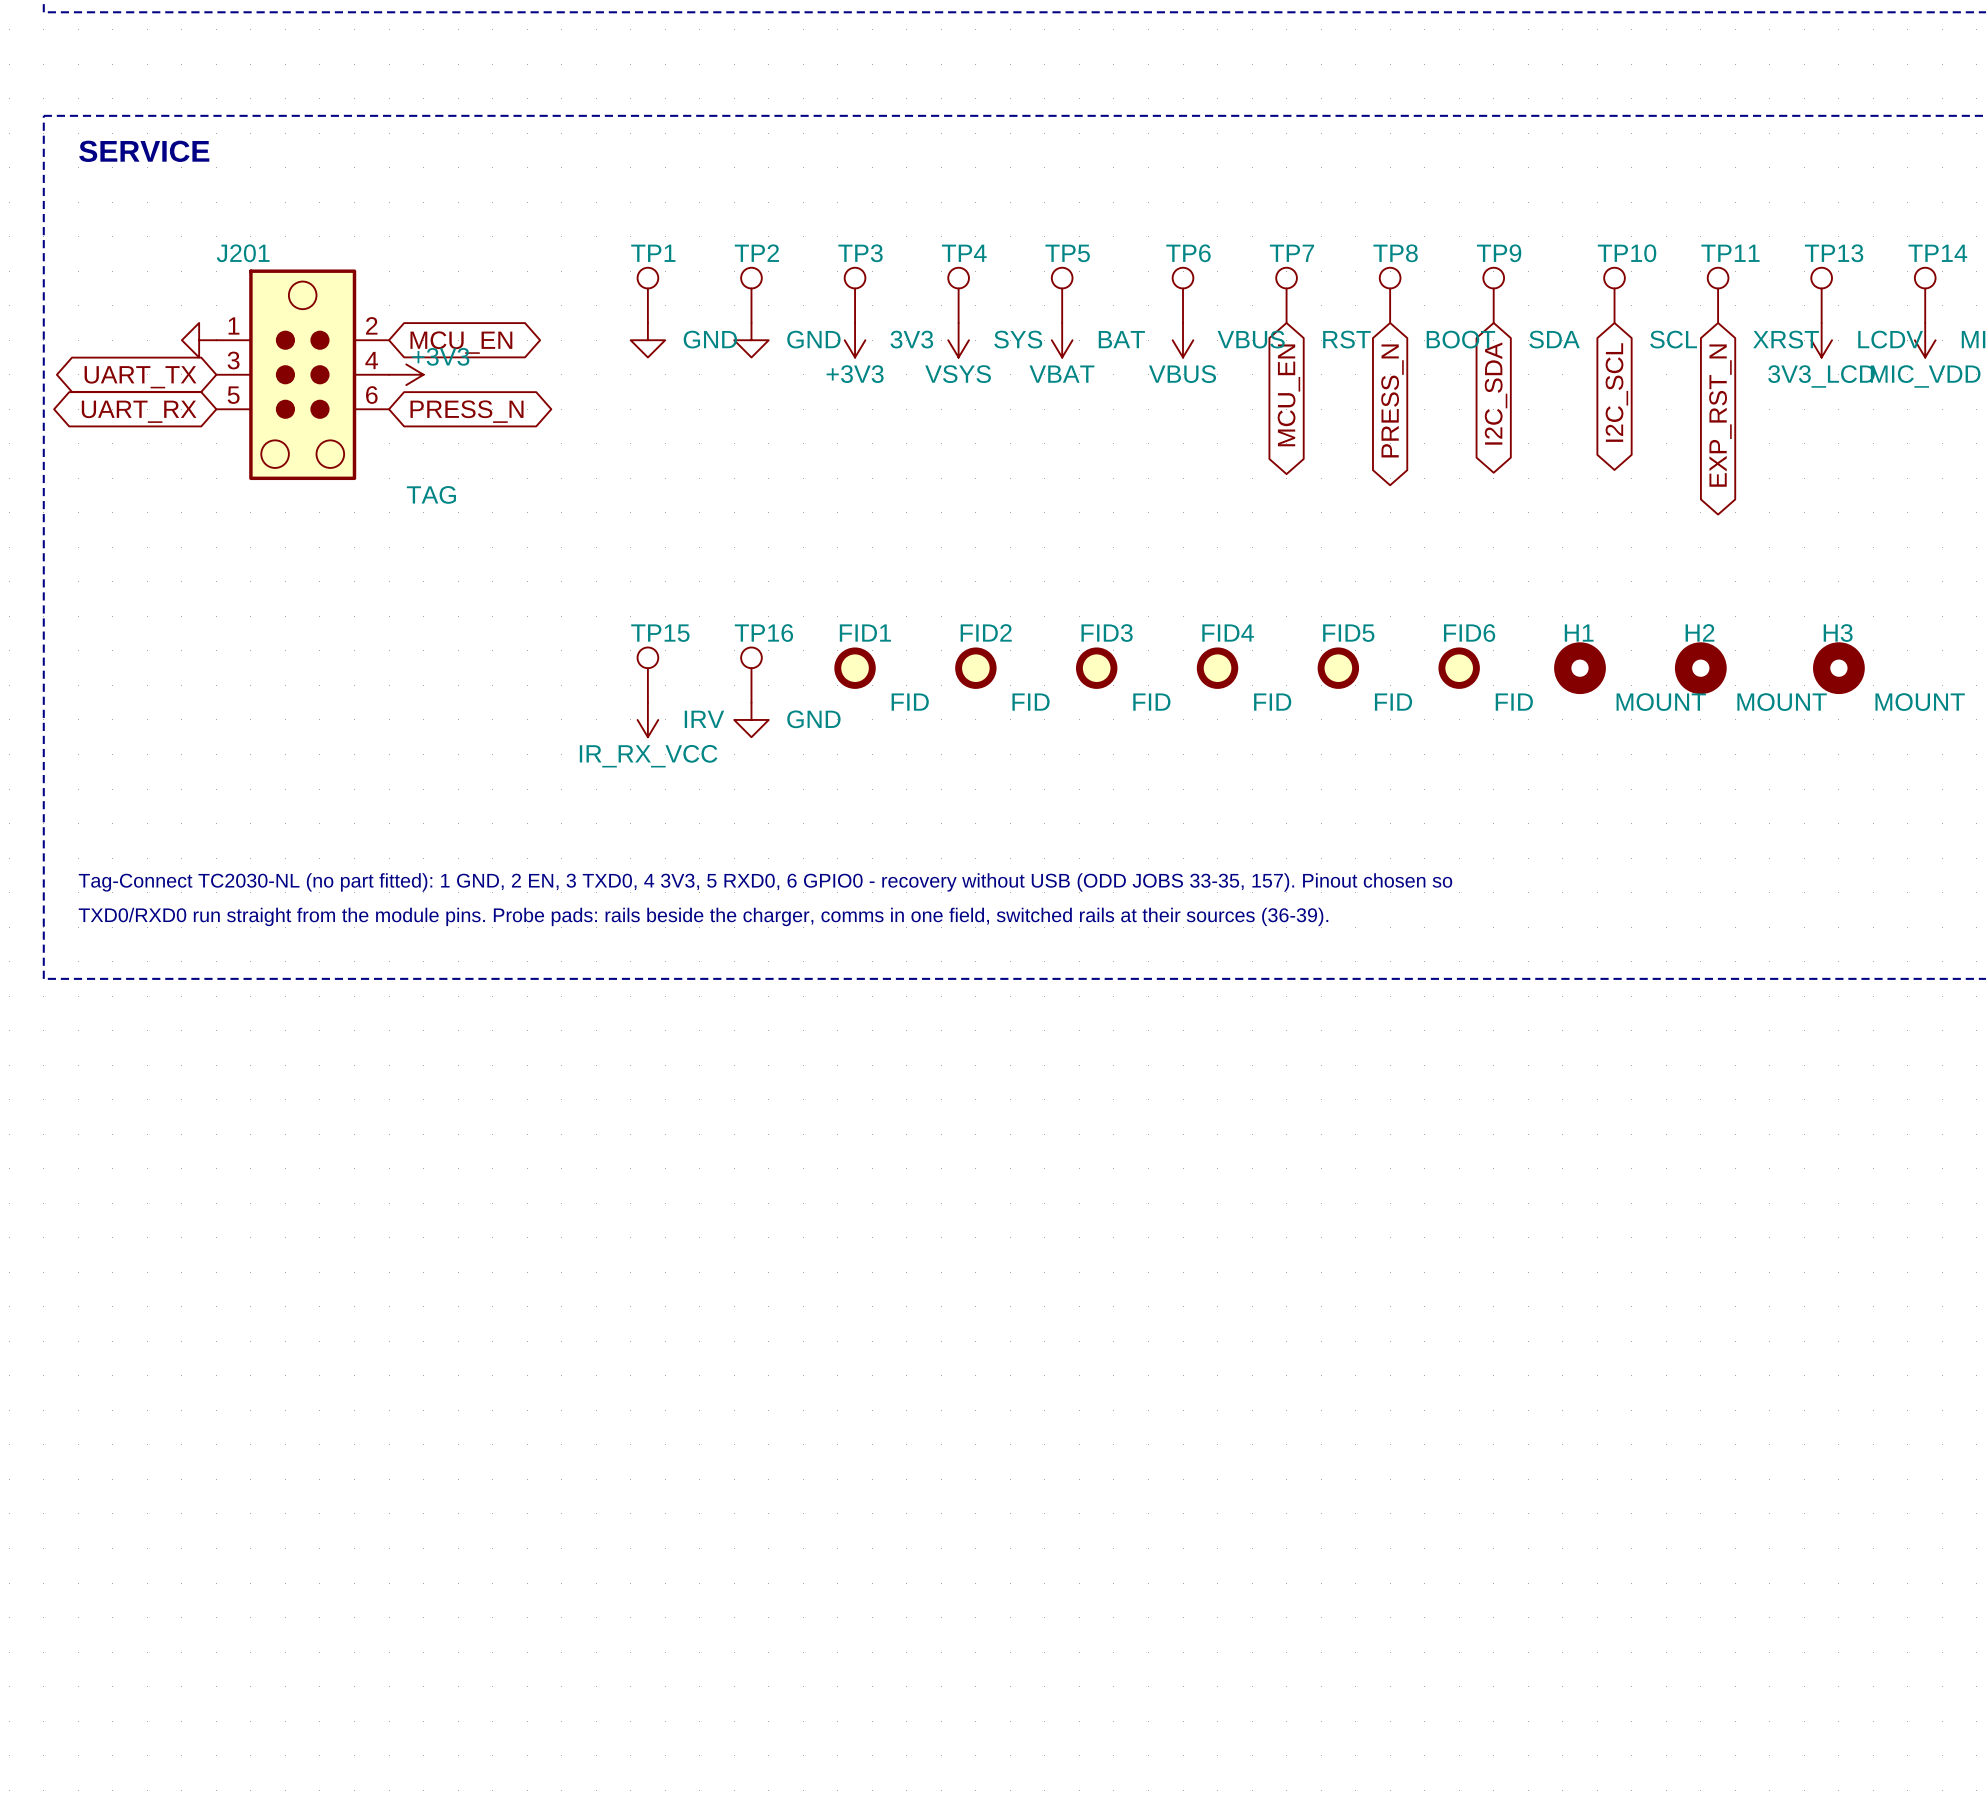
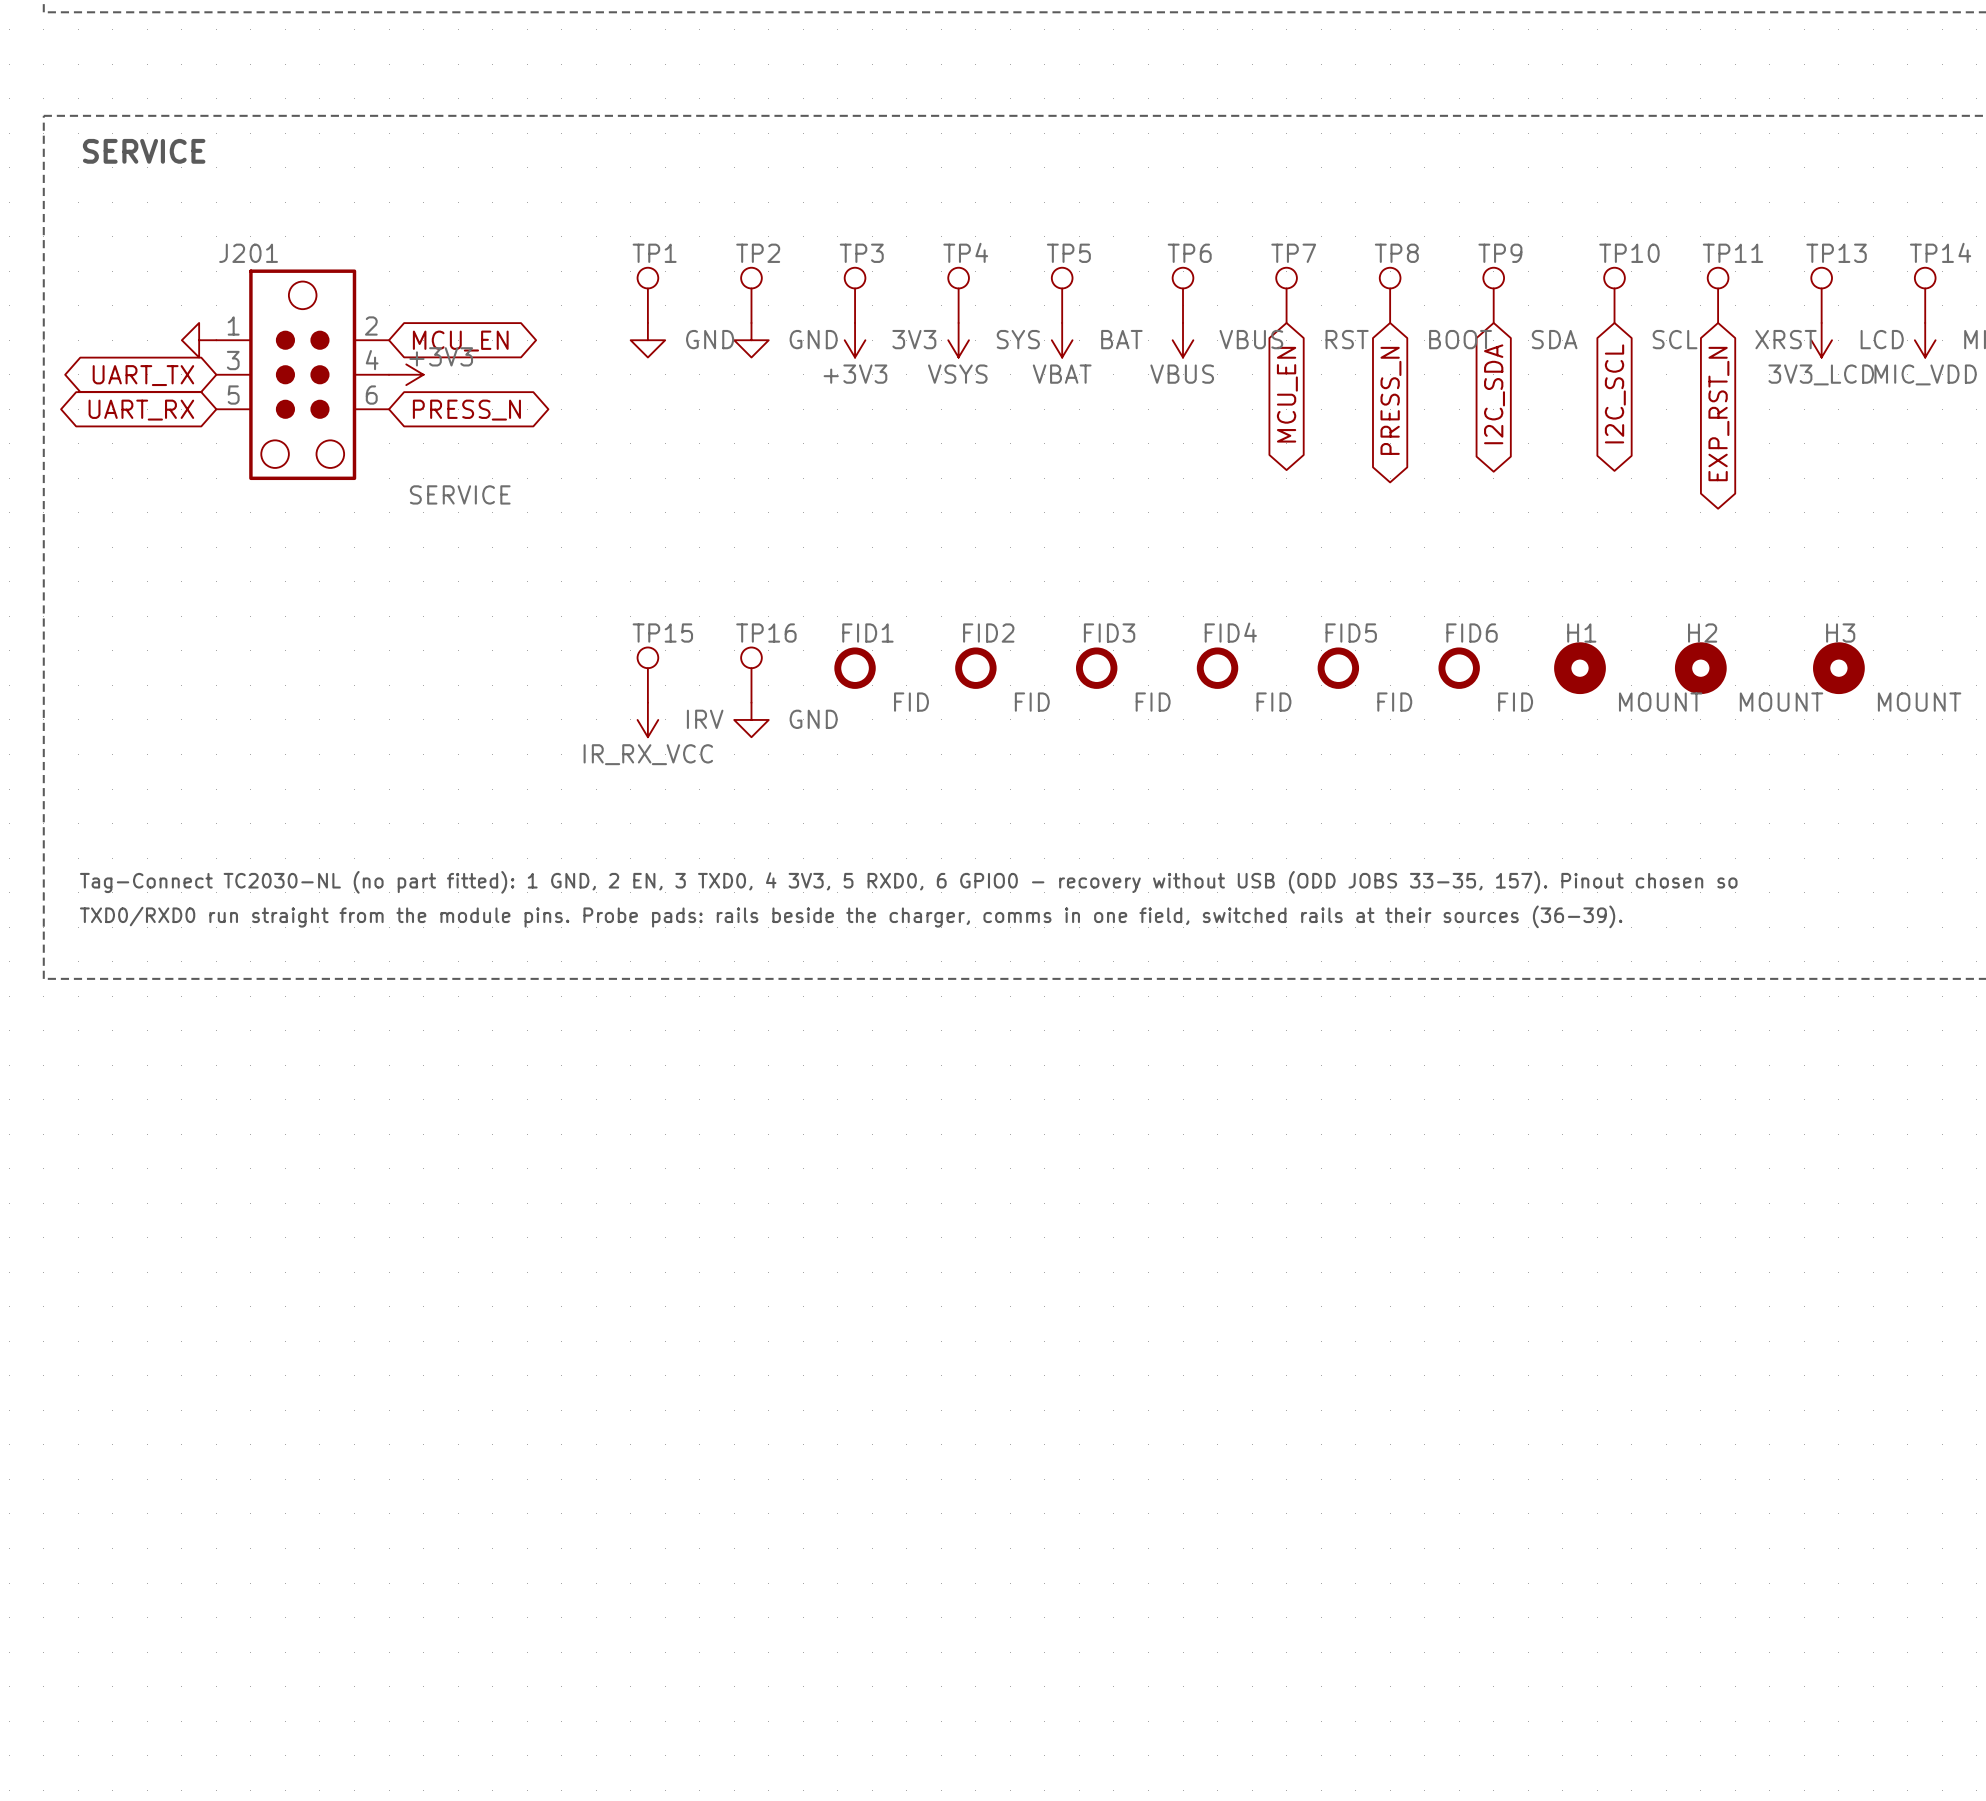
TP13 value: LCDV (1890, 339) -> LCD (1882, 339)
J201 value: TAG (431, 494) -> SERVICE (460, 494)

